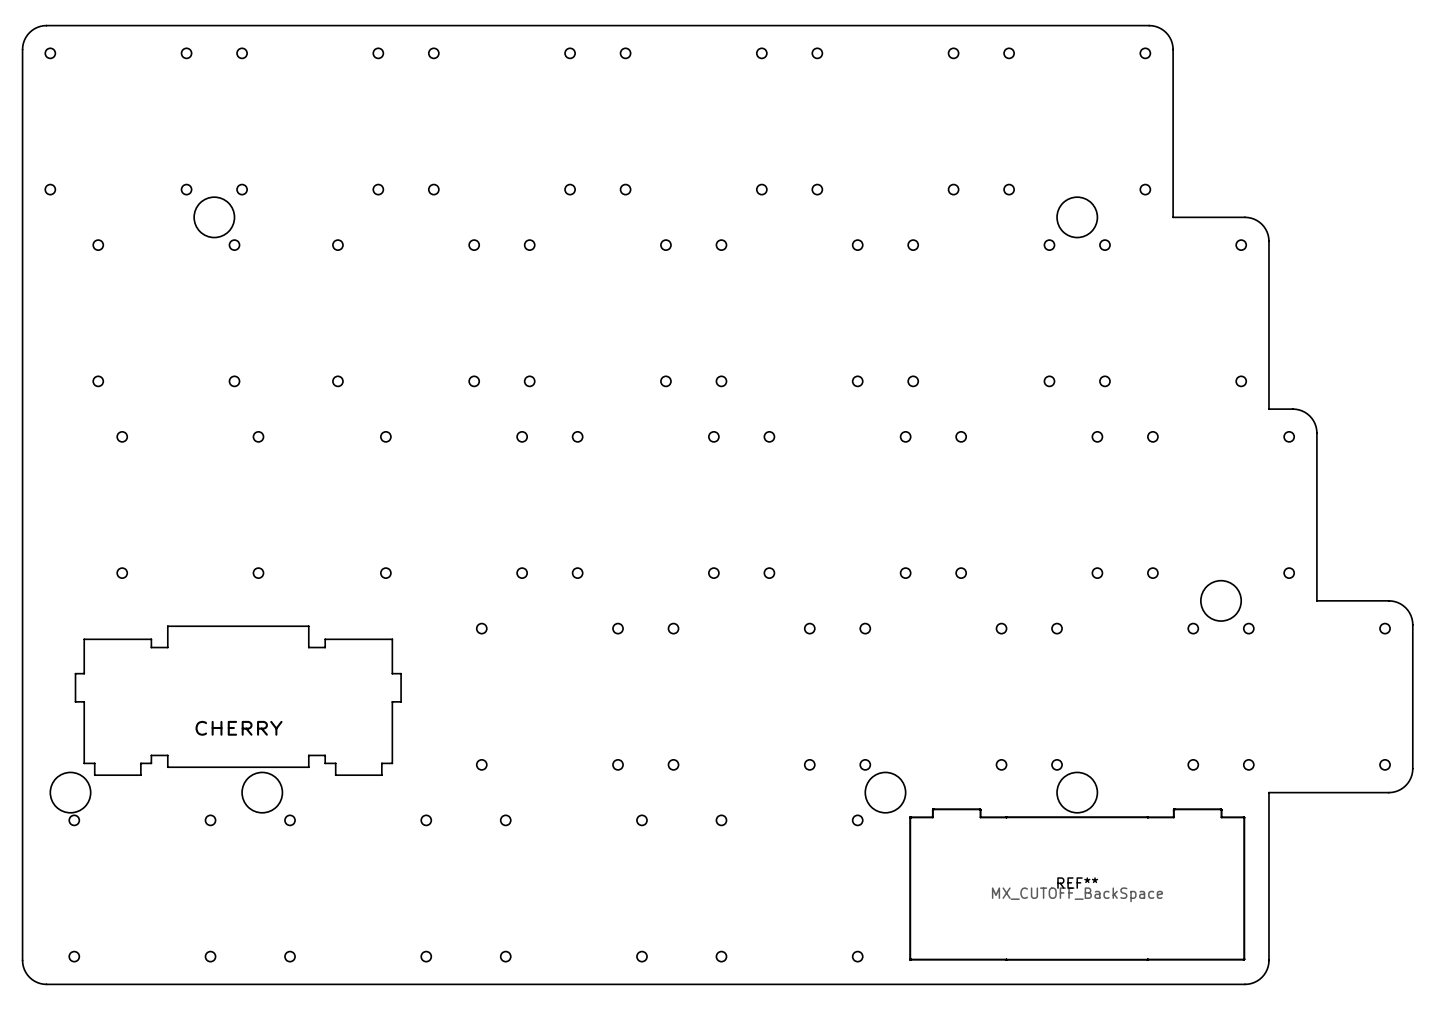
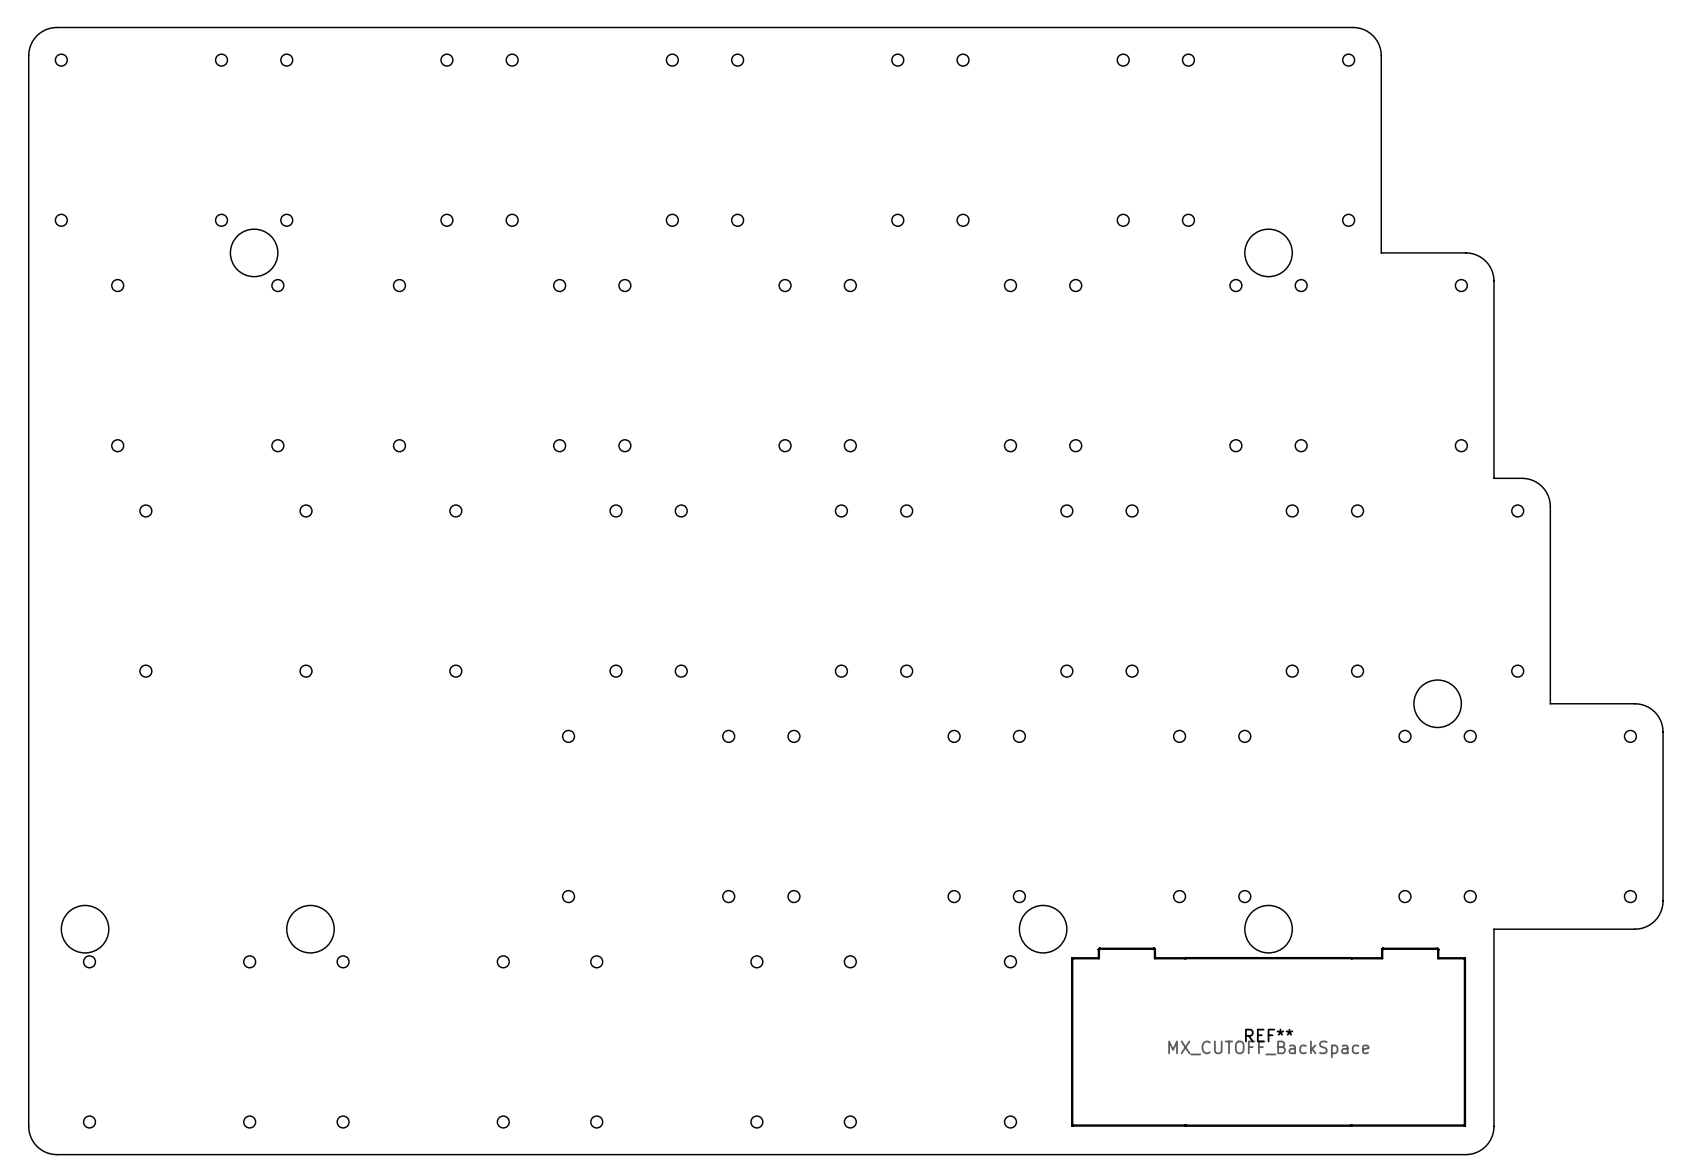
CHERRY: (238, 700) -> none

